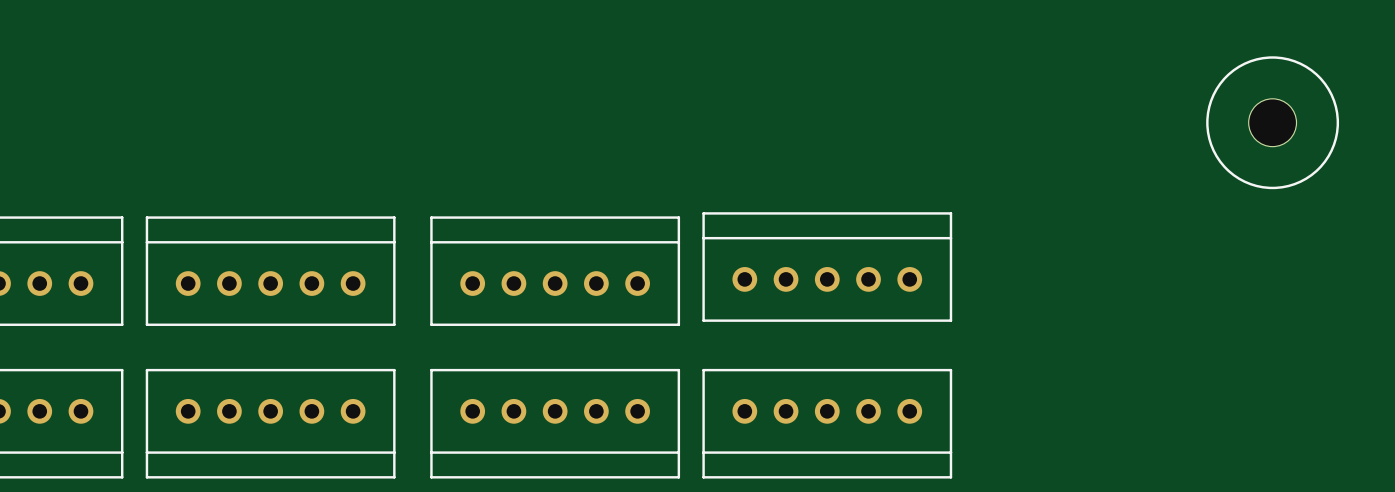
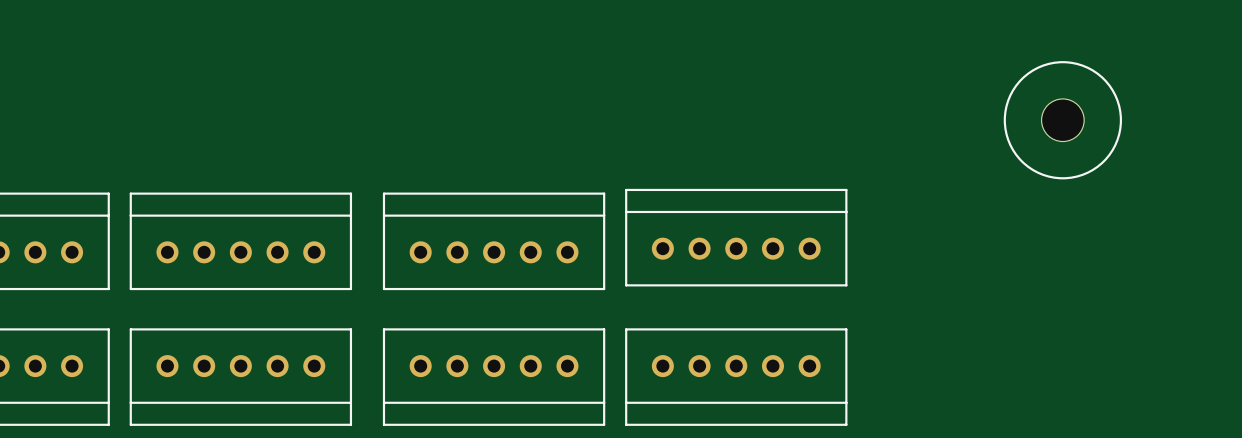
part position: (1272, 122) -> (1062, 120)

